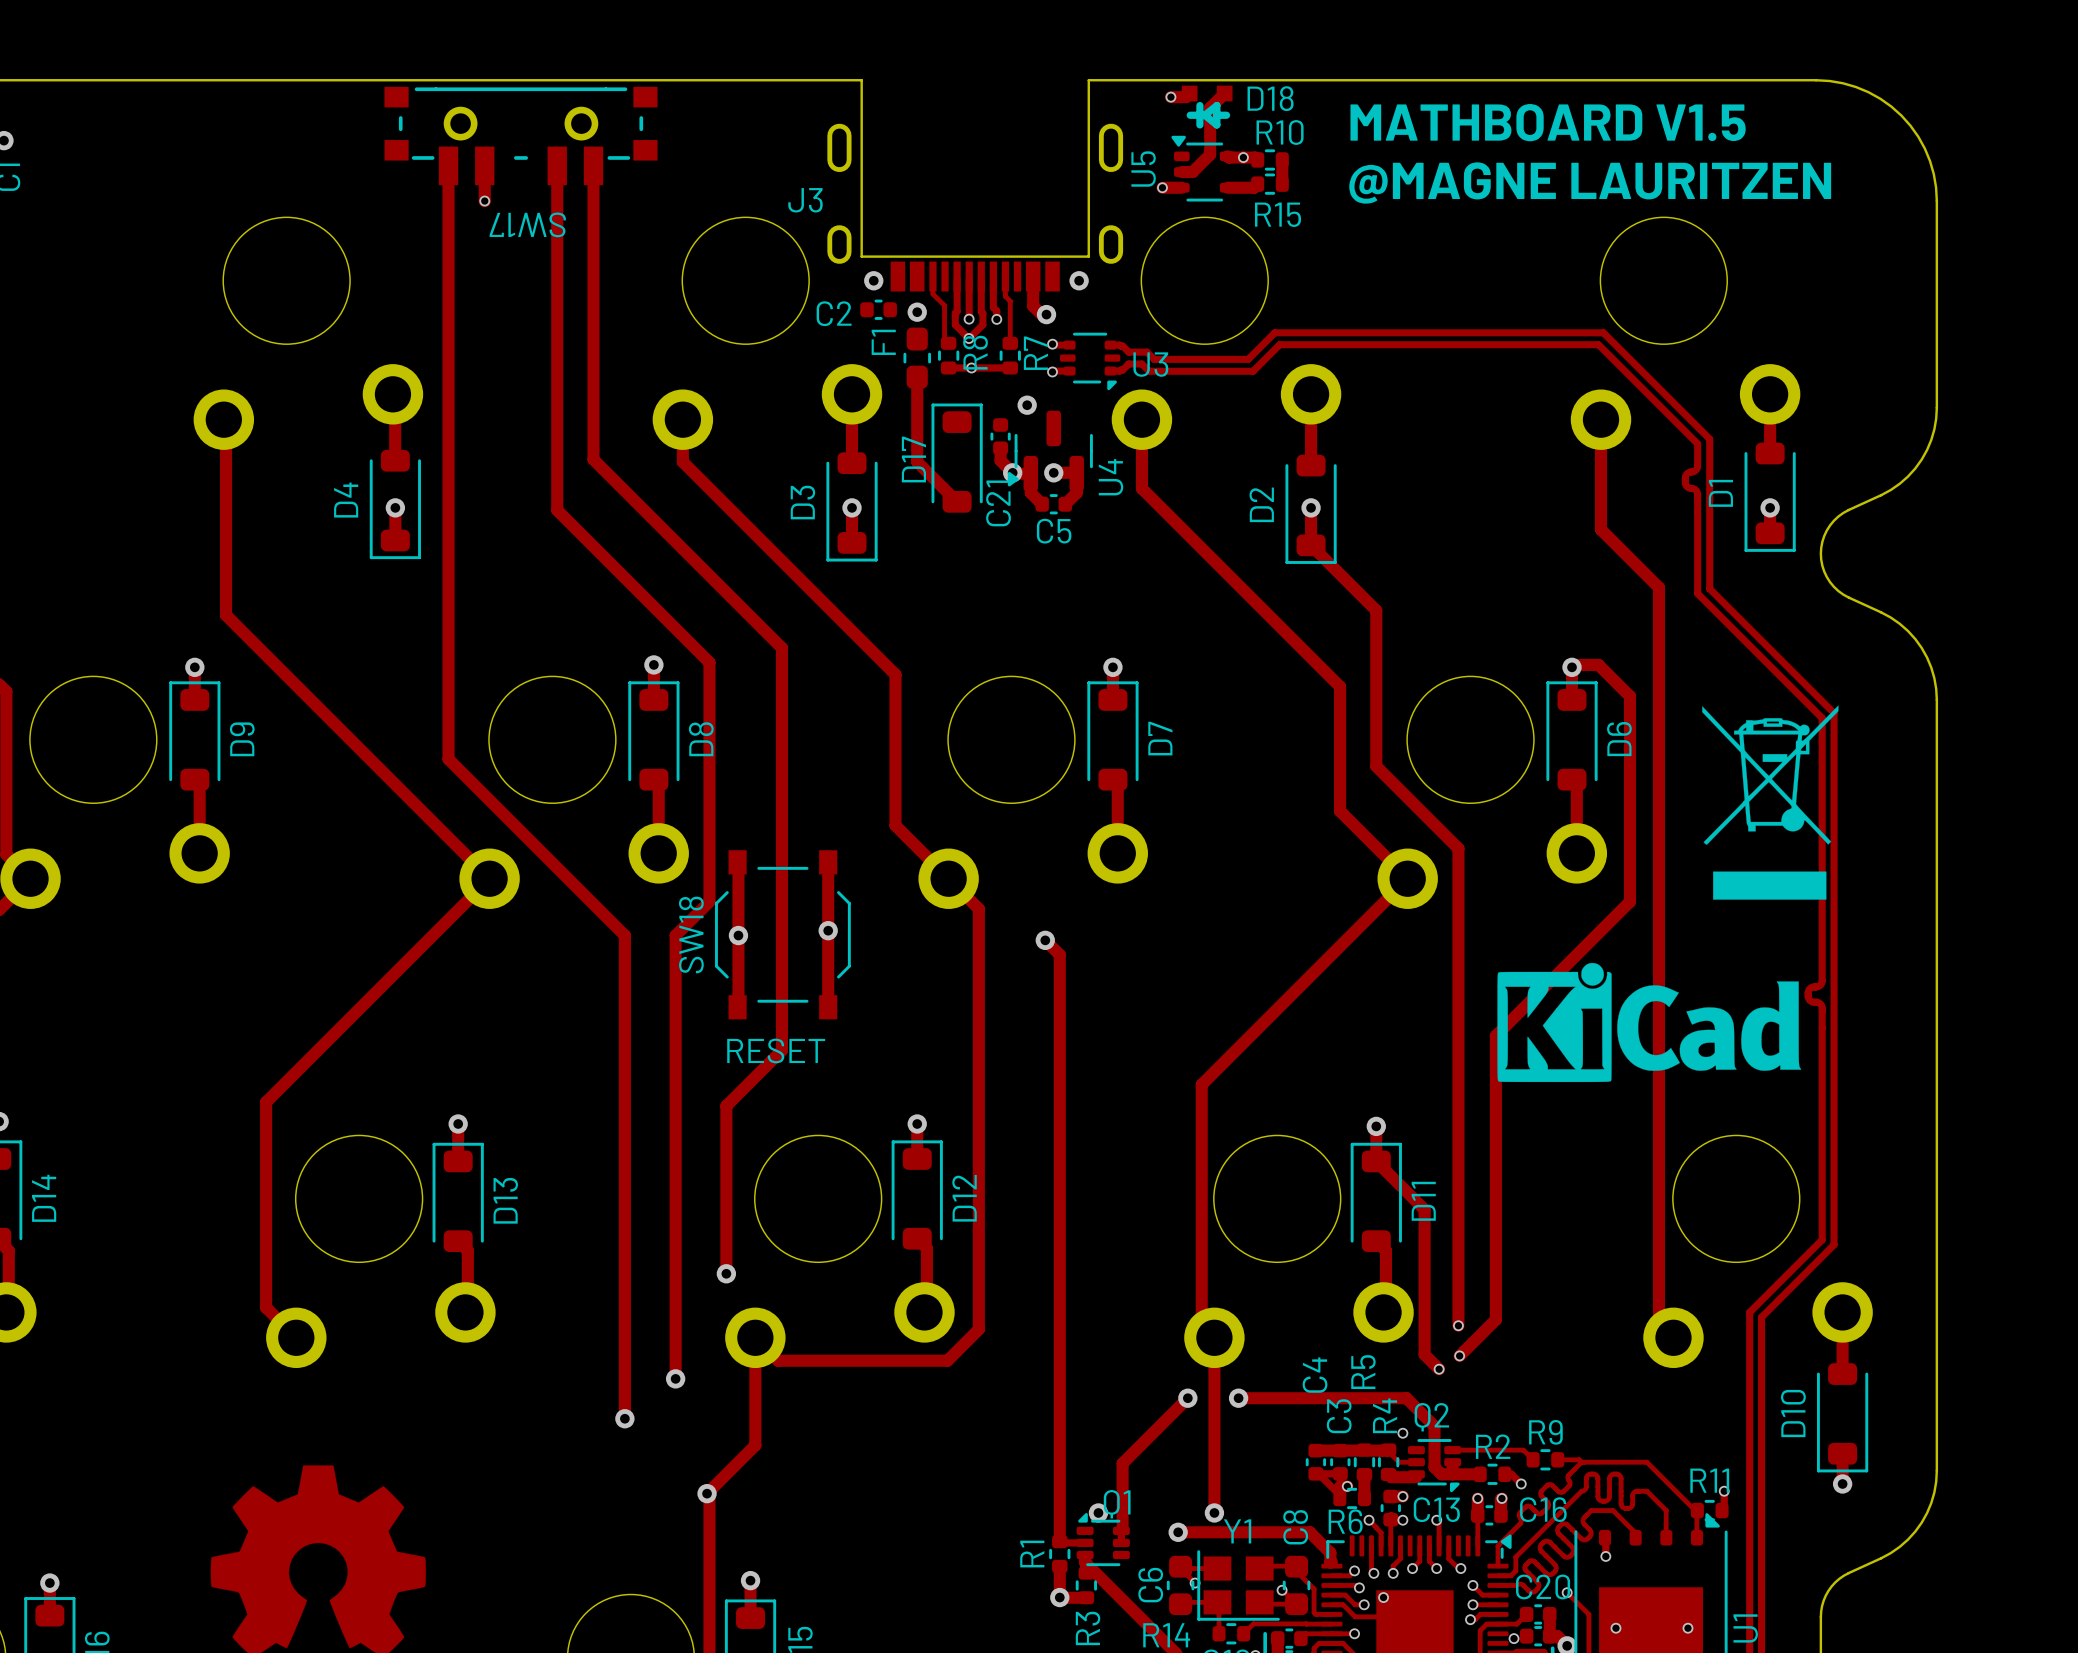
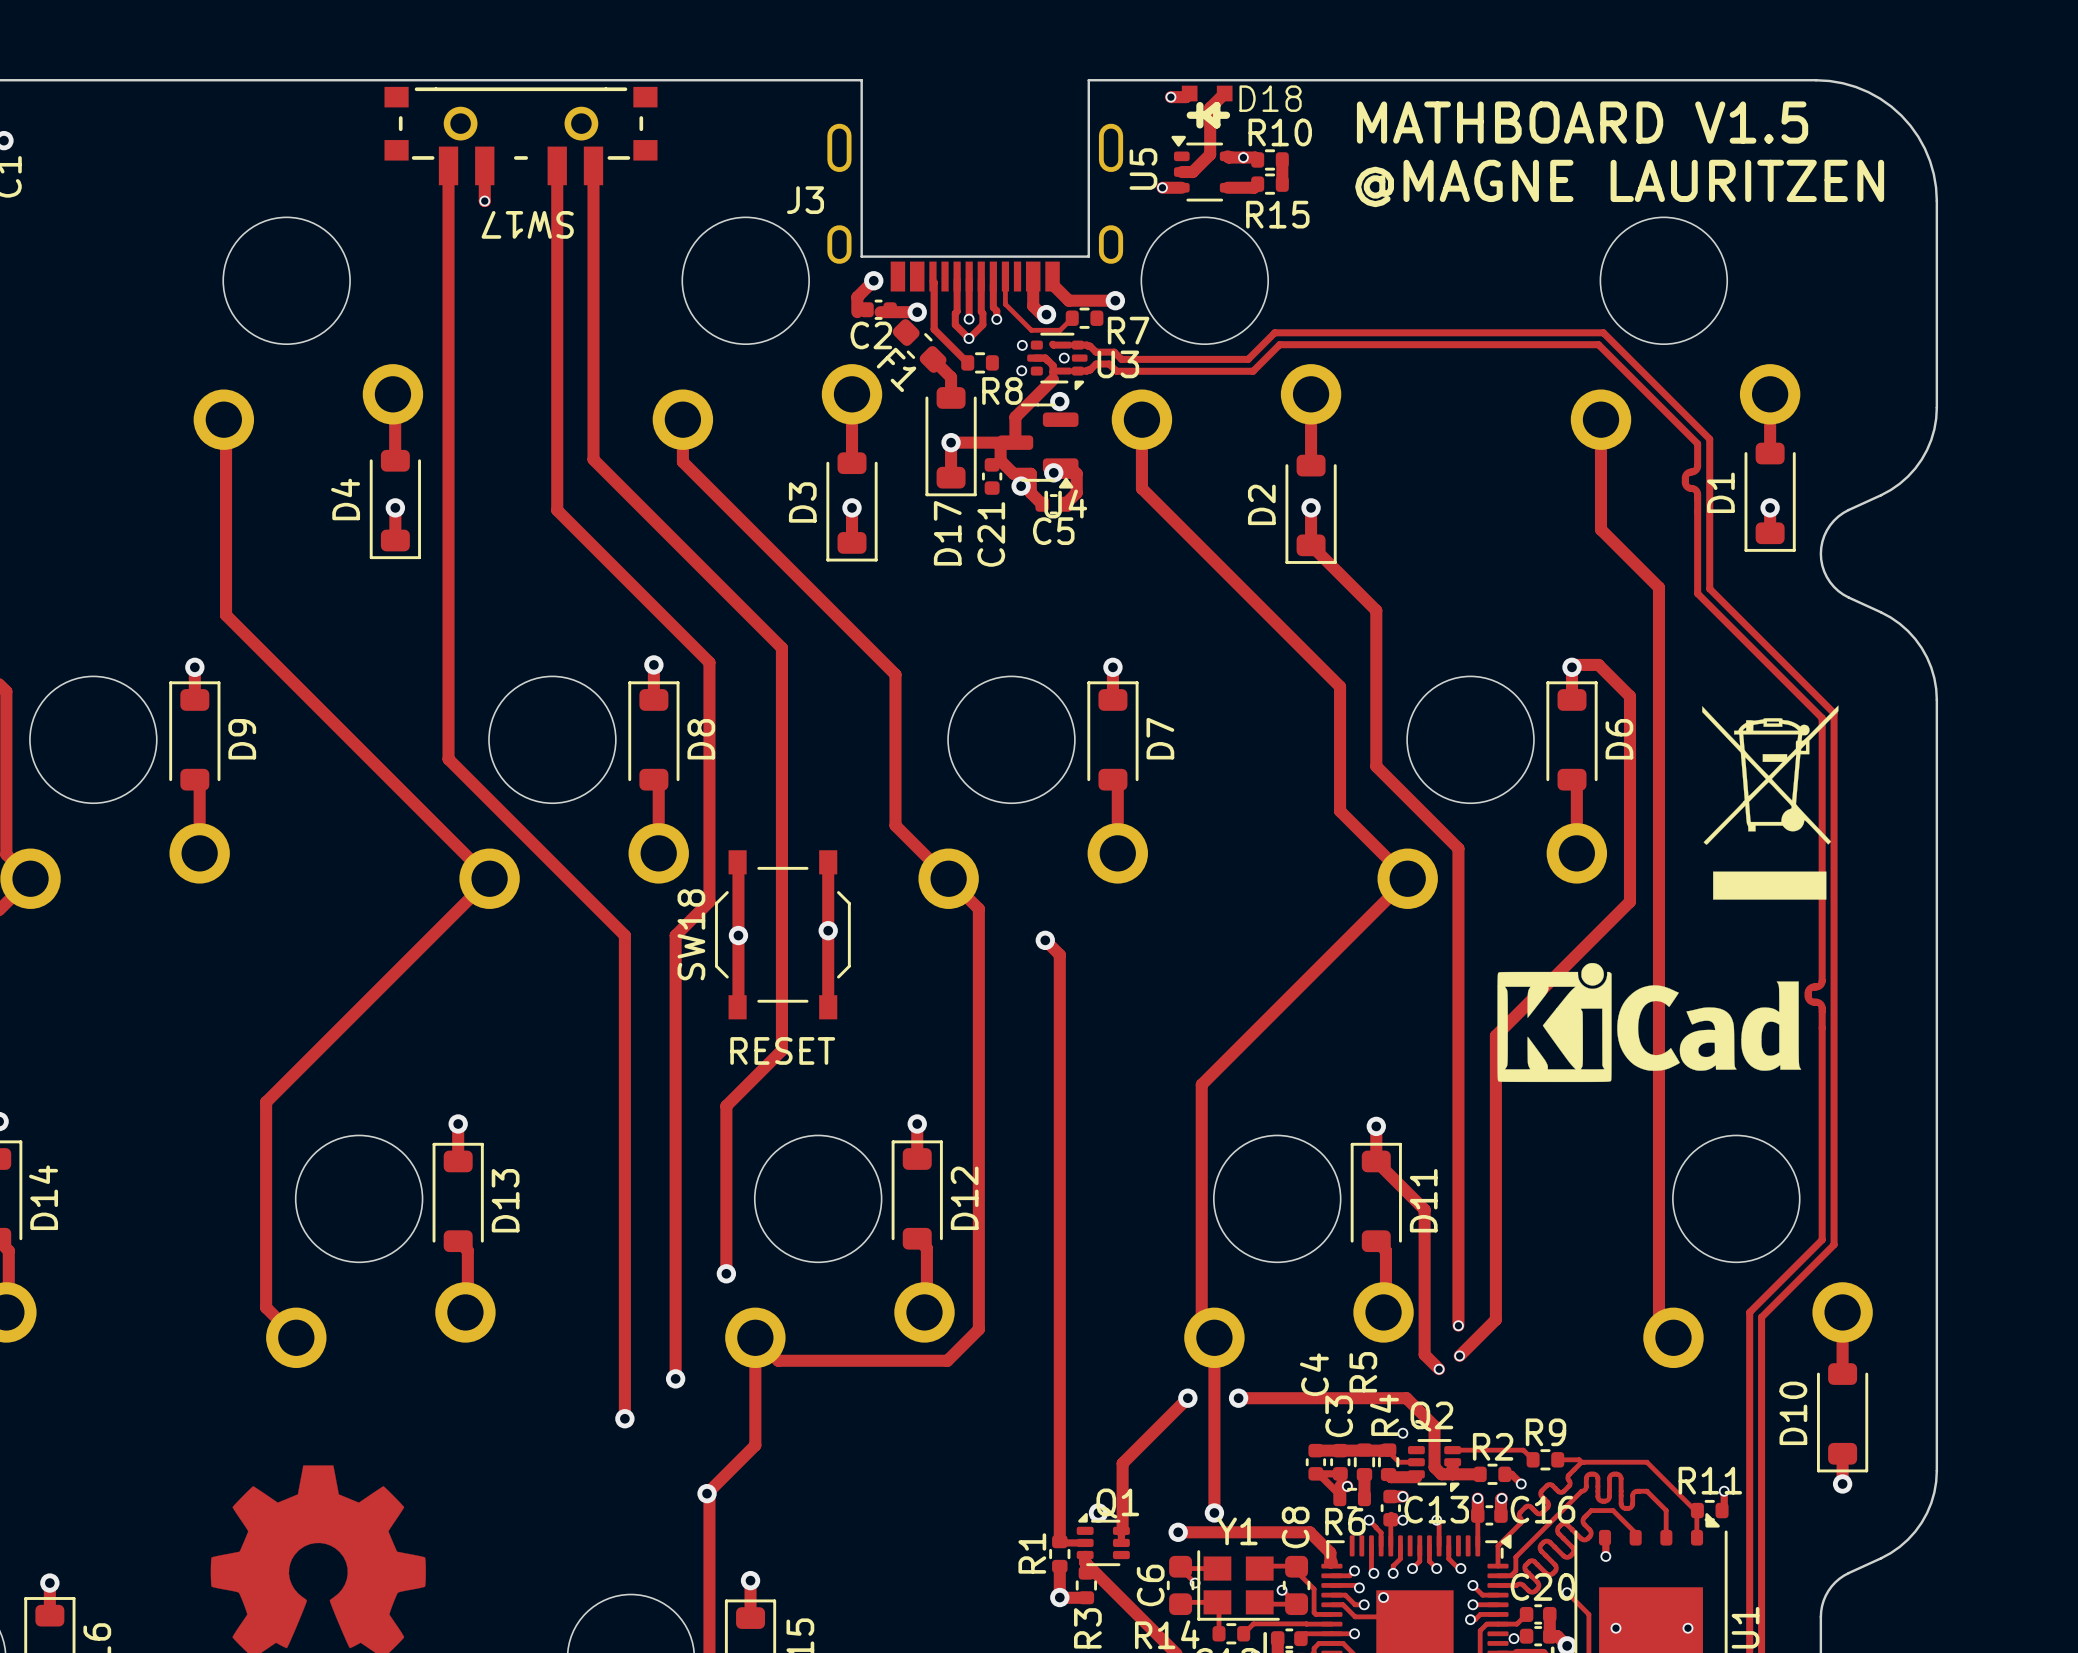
track: none -> (873, 280) (857, 297) (857, 312)
via position: (1079, 280) -> (1115, 300)
track: (932, 281) (932, 294) (944, 305) (944, 339) (948, 343) -> (932, 281) (934, 329) (967, 362)
track: none -> (1052, 284) (1068, 300) (1115, 300)
track: (1005, 296) (1010, 301) (1010, 343) -> (1005, 296) (1005, 304) (1031, 330) (1060, 330) (1072, 318)
track: none -> (880, 312) (917, 312)
C2 name position: C2 (834, 313) -> C2 (871, 335)
via: (1052, 344) -> none
via: none -> (1022, 345)
track: (1110, 345) (1122, 346) (1128, 352) (1146, 352) (1154, 359) -> (1077, 345) (1090, 346) (1096, 352) (1114, 352) (1121, 359) (1154, 359)
R8 rotation: 0° (948, 355) -> 90° clockwise (980, 362)
R8 position: (948, 355) -> (980, 362)
R7 rotation: 0° (1010, 355) -> 90° clockwise (1084, 318)
R7 position: (1010, 355) -> (1084, 318)
F1 rotation: 0° (917, 358) -> 45° counterclockwise (919, 346)
track: none -> (1035, 358) (1045, 358) (1053, 365) (1053, 379) (1015, 417) (1015, 442) (951, 442) (951, 477)
via: none -> (1064, 358)
track: none -> (933, 359) (951, 377) (951, 397)
U3 position: (1090, 361) -> (1057, 361)
track: (948, 367) (1010, 367) -> none
via: (971, 367) -> none
via: none -> (1021, 370)
via: (1052, 371) -> none
track: (1110, 371) (1122, 370) (1128, 364) (1141, 364) (1149, 371) -> (1077, 371) (1090, 370) (1096, 364) (1109, 364) (1116, 371) (1149, 371)
track: (917, 377) (917, 461) (957, 501) -> none
via position: (1027, 405) -> (1059, 401)
C21 position: (1000, 436) -> (992, 476)
via: none -> (951, 442)
U4 rotation: 0° (1050, 451) -> 90° counterclockwise (1038, 446)
D17 rotation: 0° (957, 458) -> 180° (951, 441)
D17 name position: D17 (913, 459) -> D17 (947, 533)
via position: (1012, 472) -> (1021, 486)
U4 name position: U4 (1110, 477) -> U4 (1065, 503)
C21 name position: C21 (998, 503) -> C21 (991, 534)

